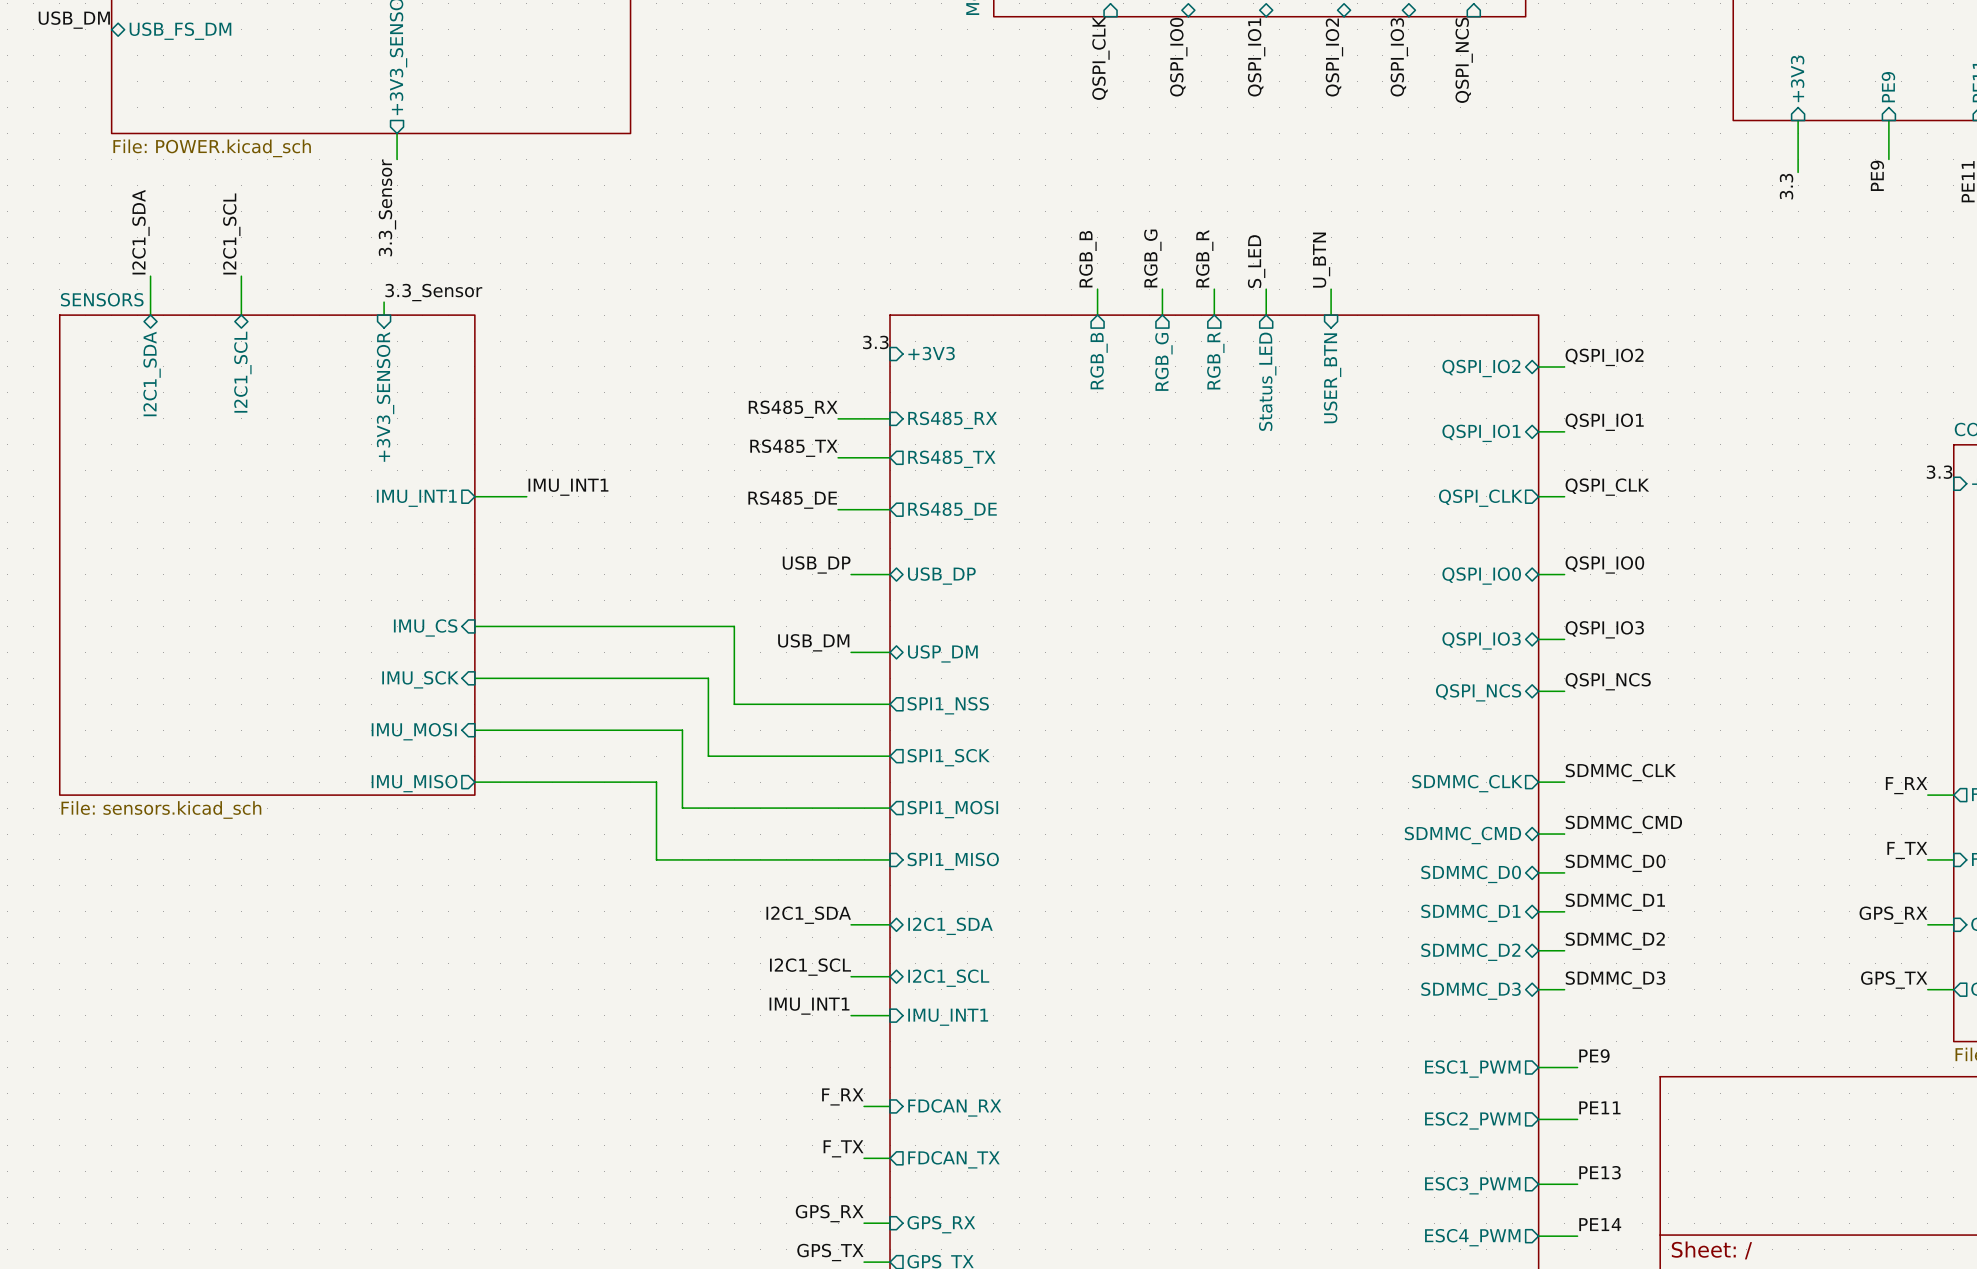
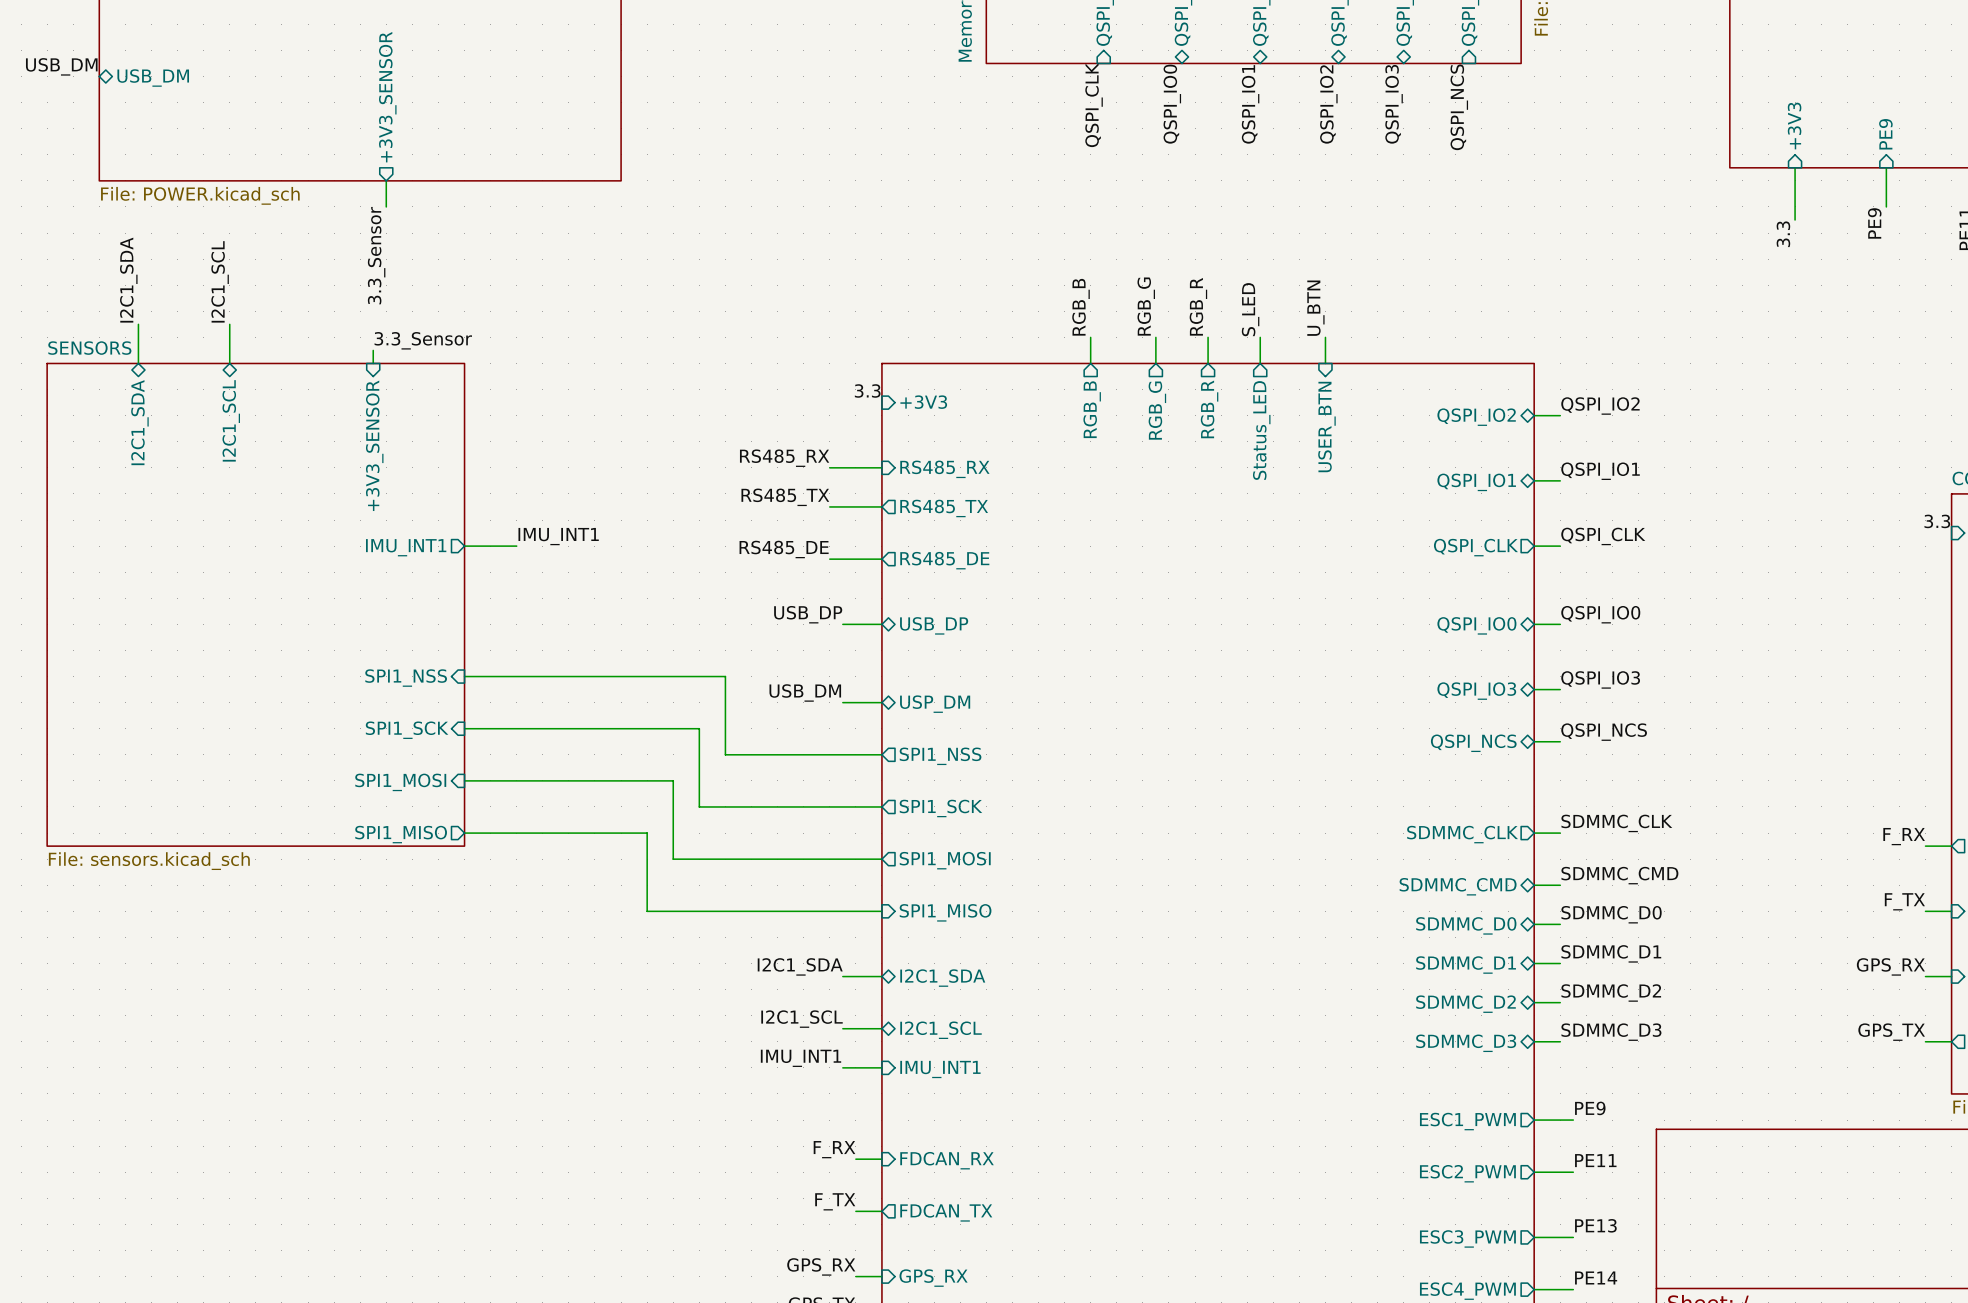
sheet pin: USB_FS_DM (180, 31) -> USB_DM (153, 78)
sheet pin: IMU_CS (425, 627) -> SPI1_NSS (406, 678)
sheet pin: IMU_SCK (420, 679) -> SPI1_SCK (407, 730)
sheet pin: IMU_MOSI (414, 731) -> SPI1_MOSI (400, 782)
sheet pin: IMU_MISO (414, 783) -> SPI1_MISO (401, 834)

